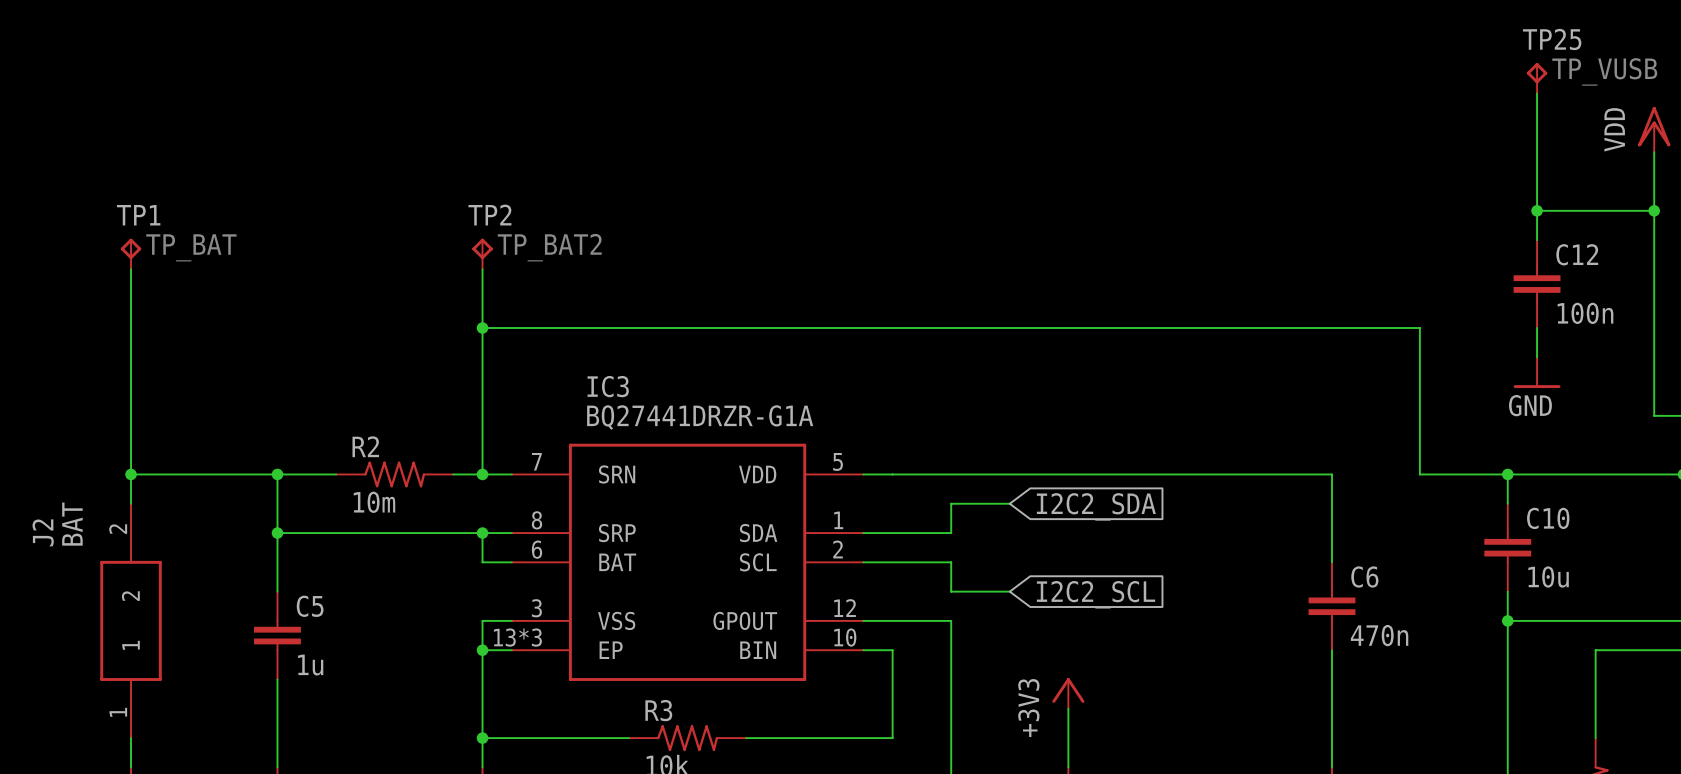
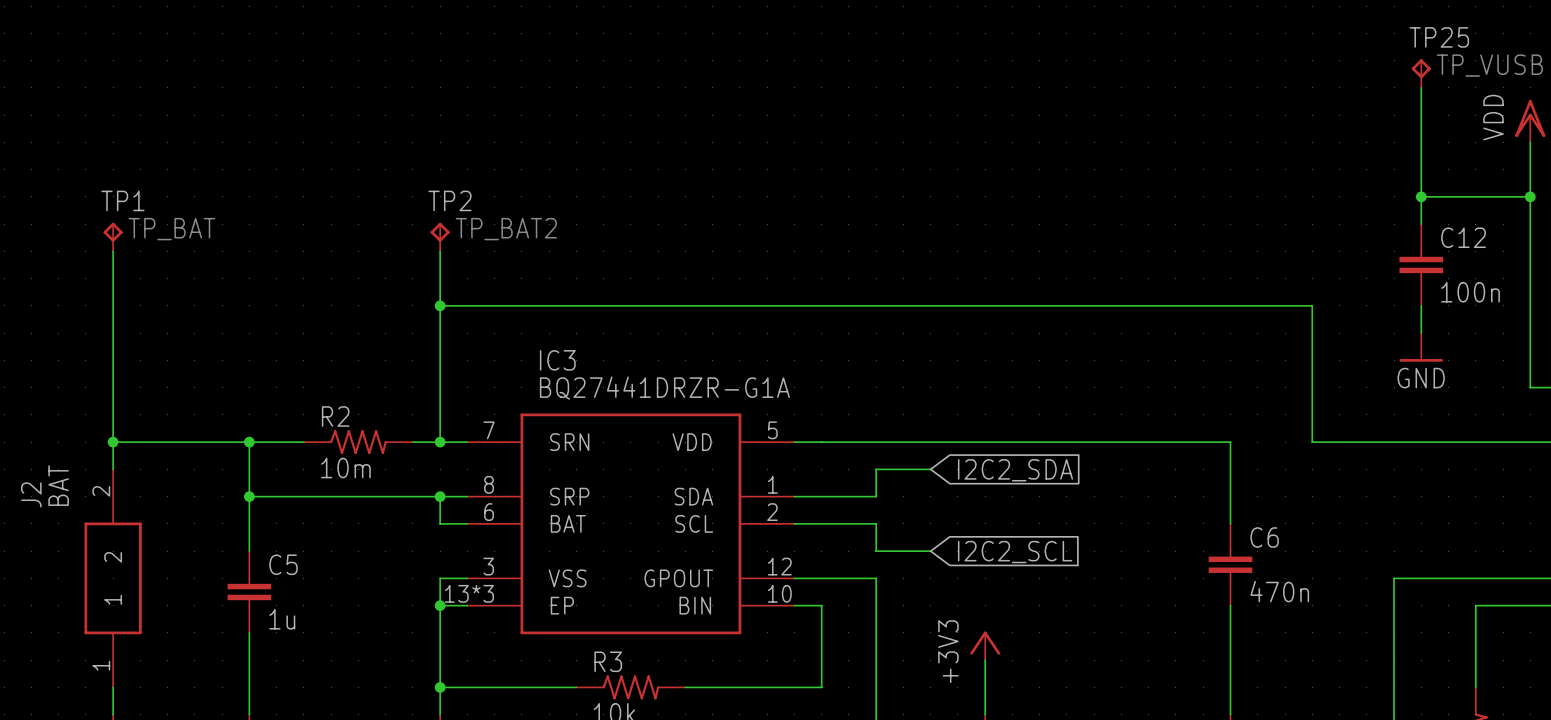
wire: (1507, 474) (1507, 503) -> none
junction: (1507, 474) -> none
C10: 10u (1507, 547) -> none
wire: (1507, 591) (1507, 620) -> none
junction: (1507, 620) -> none

